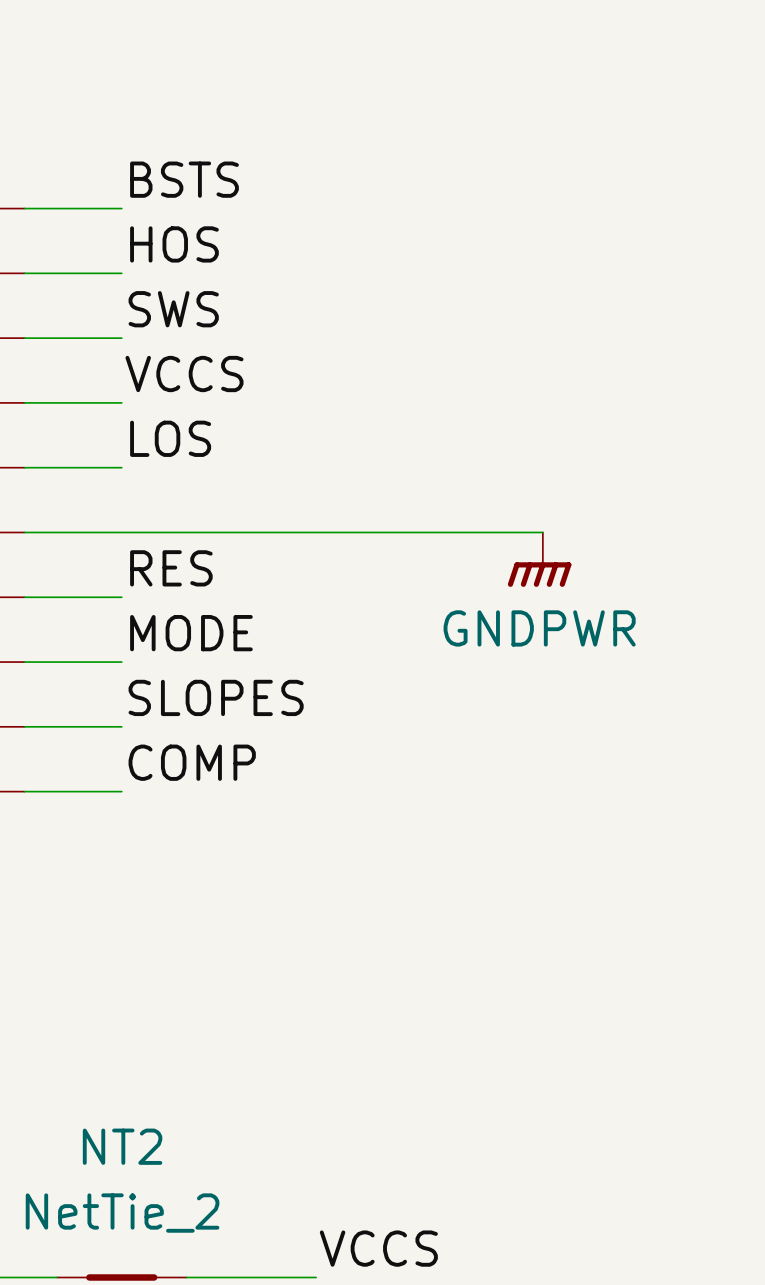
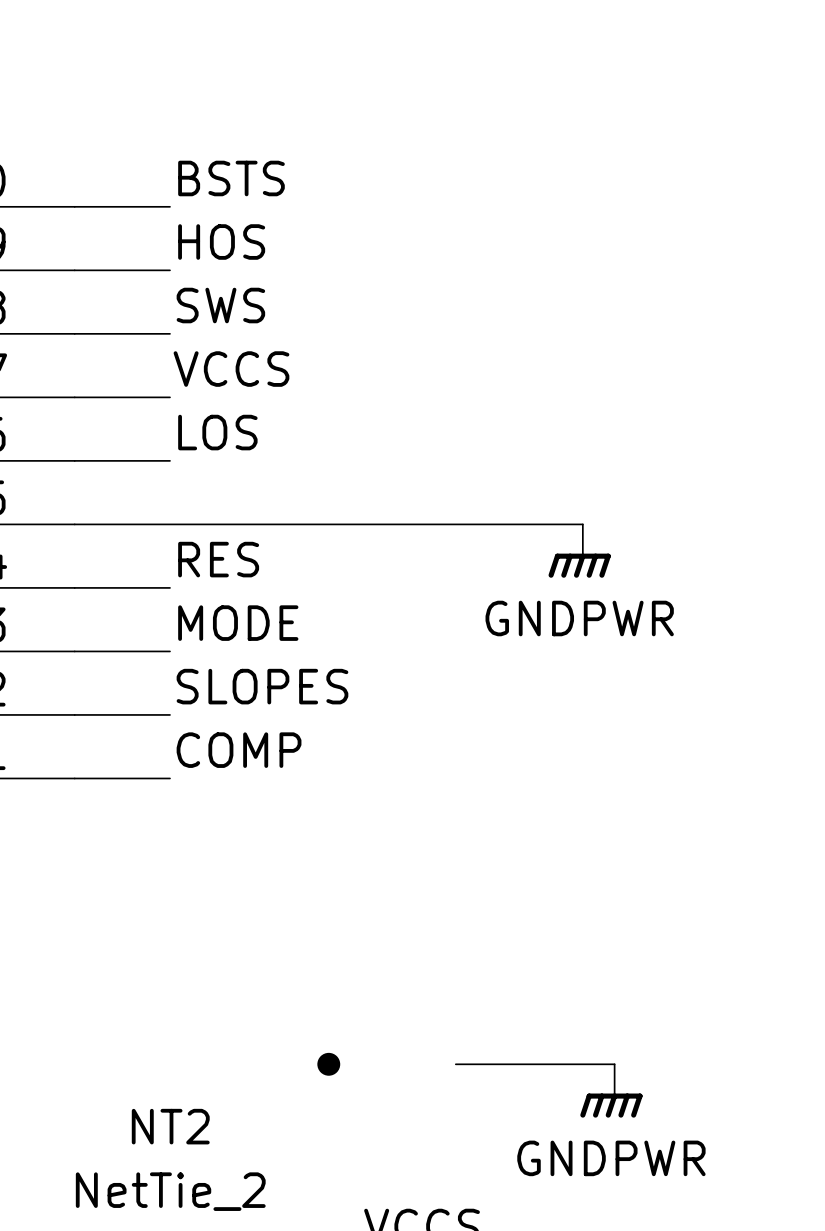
junction: none -> (328, 1064)
wire: none -> (455, 1064) (614, 1064)
power symbol: none -> GNDPWR (611, 1090)

